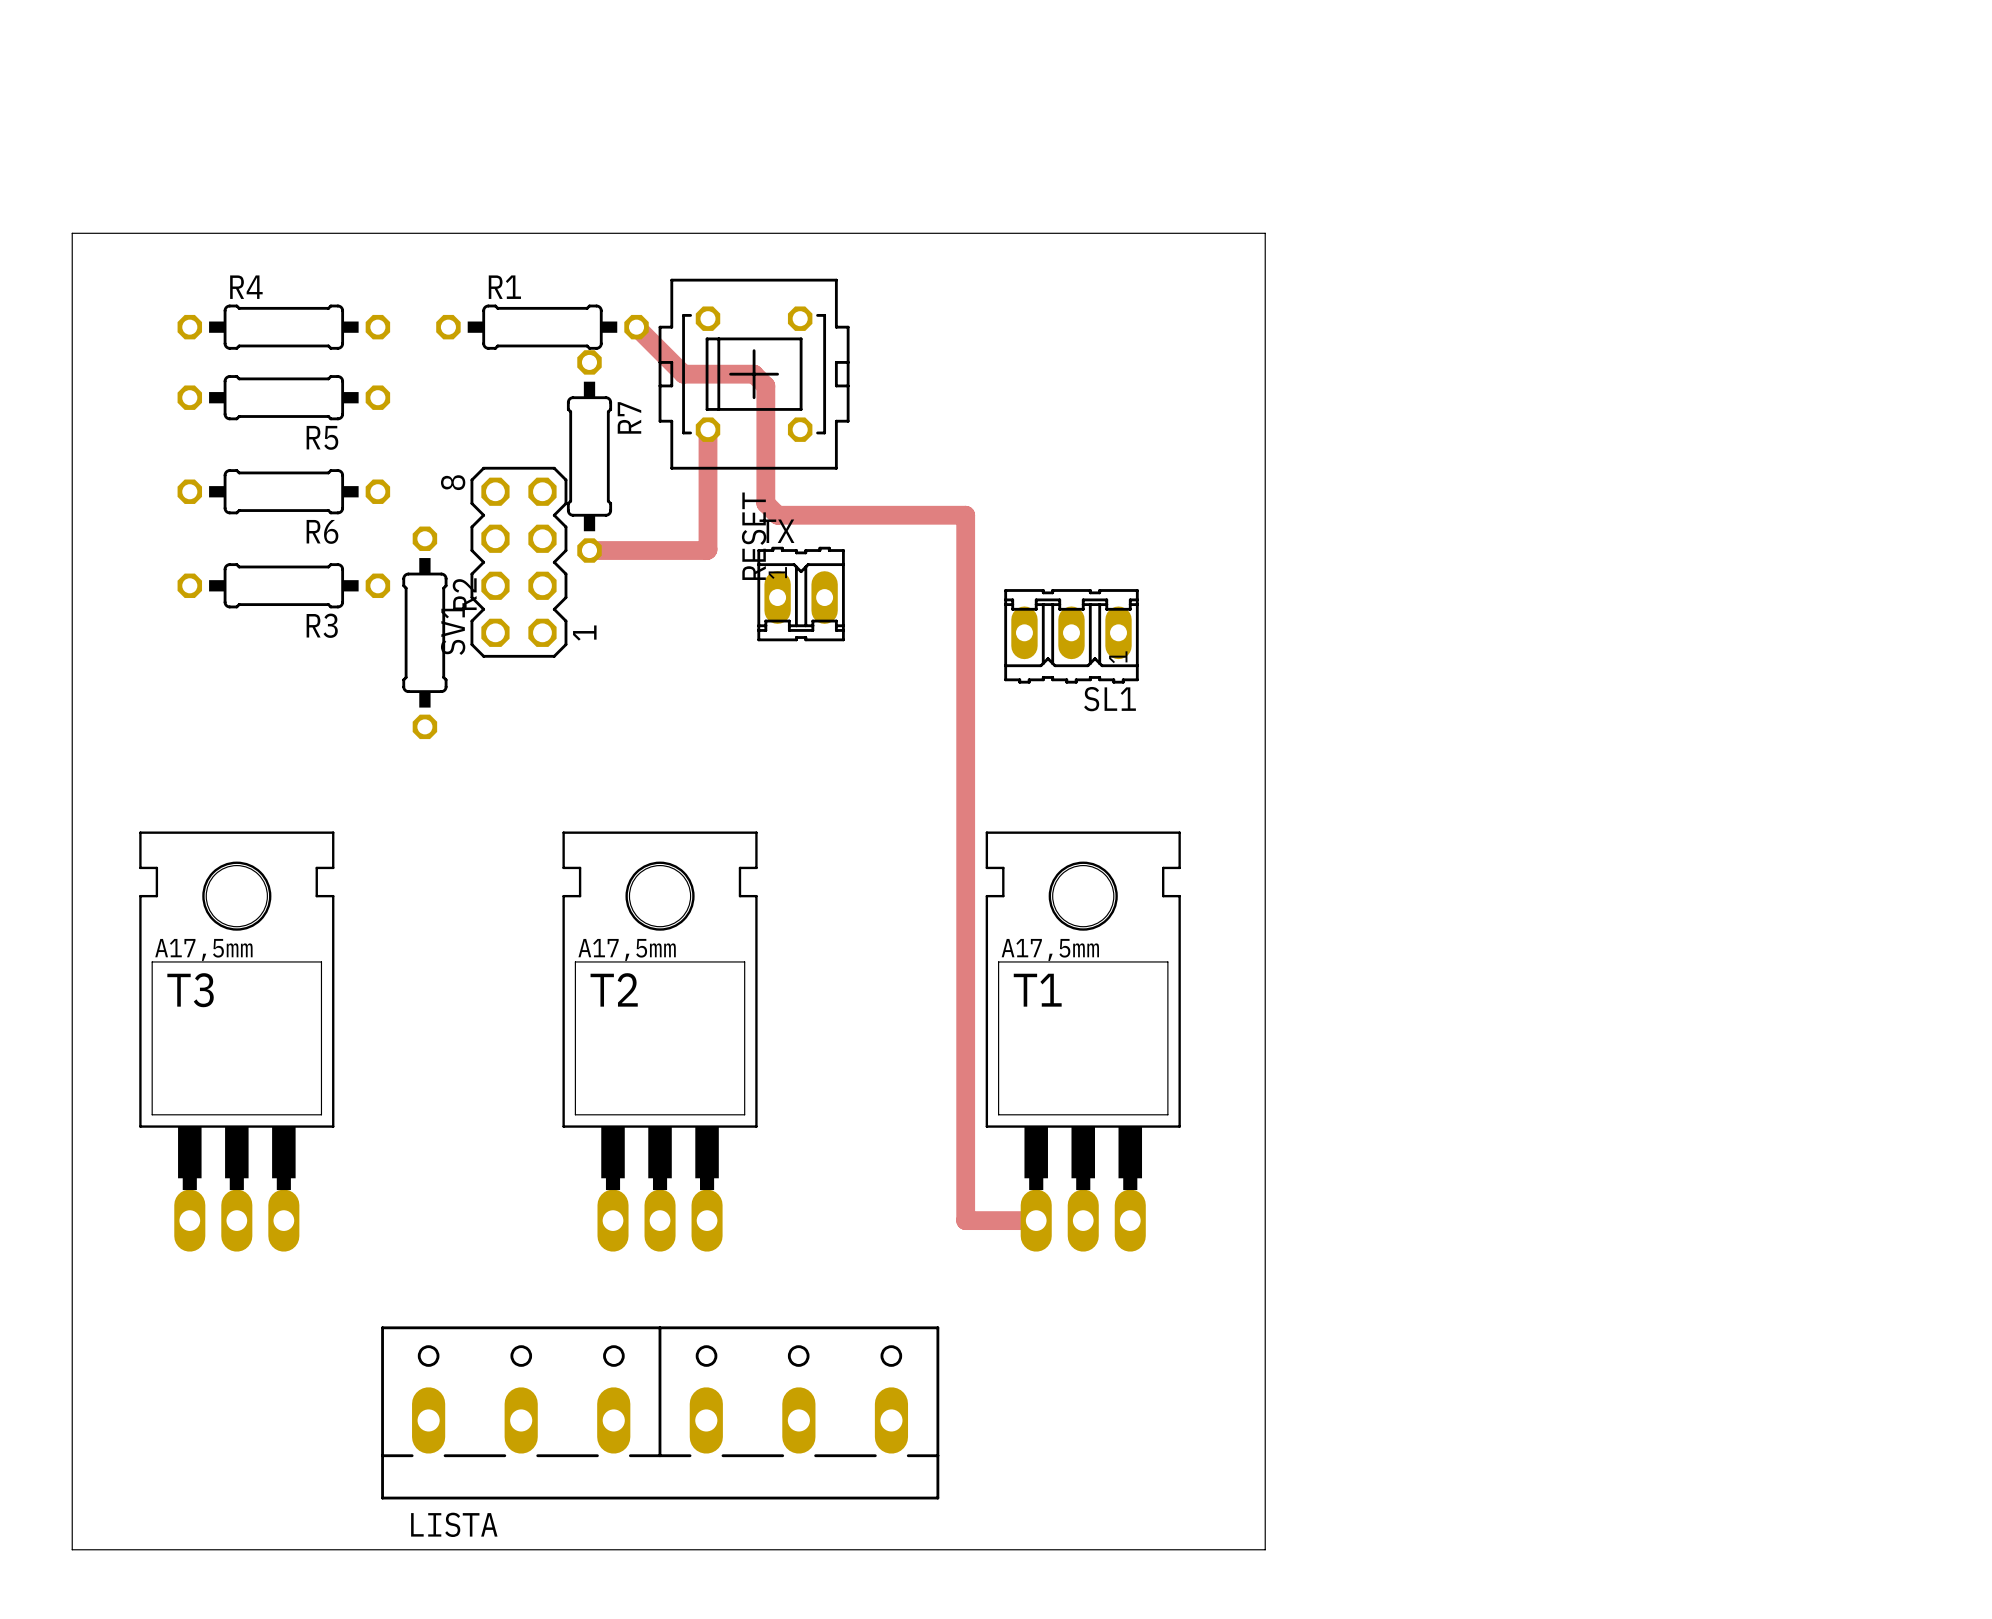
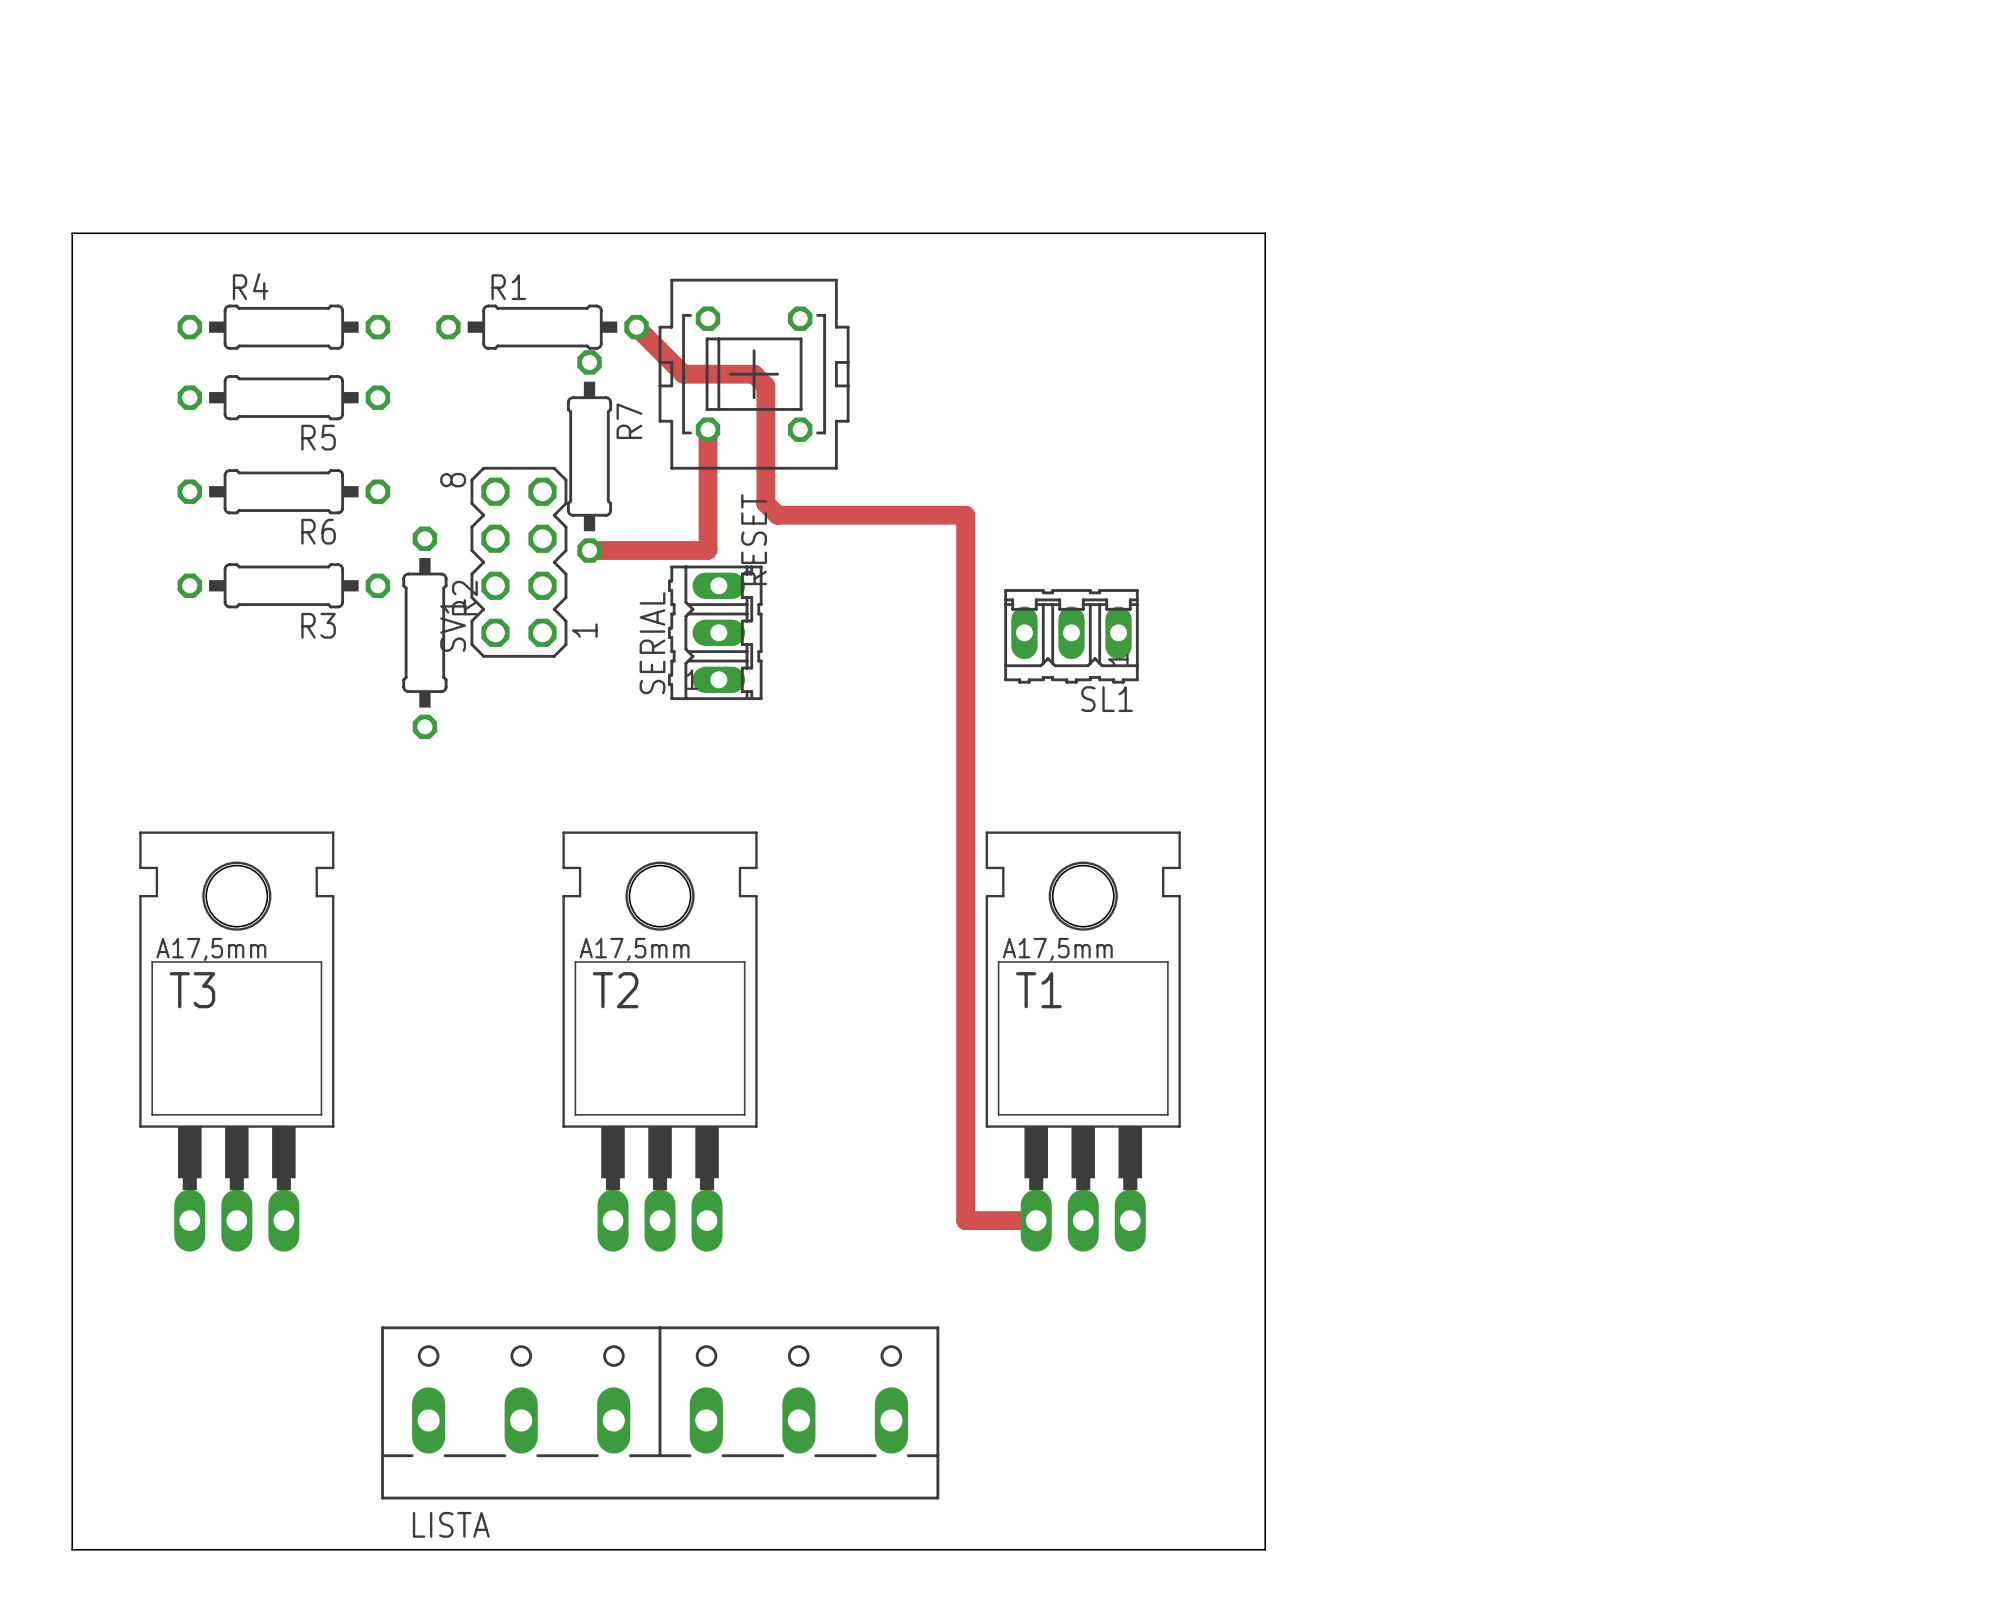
TX: (801, 594) -> none
SERIAL: none -> (715, 632)

